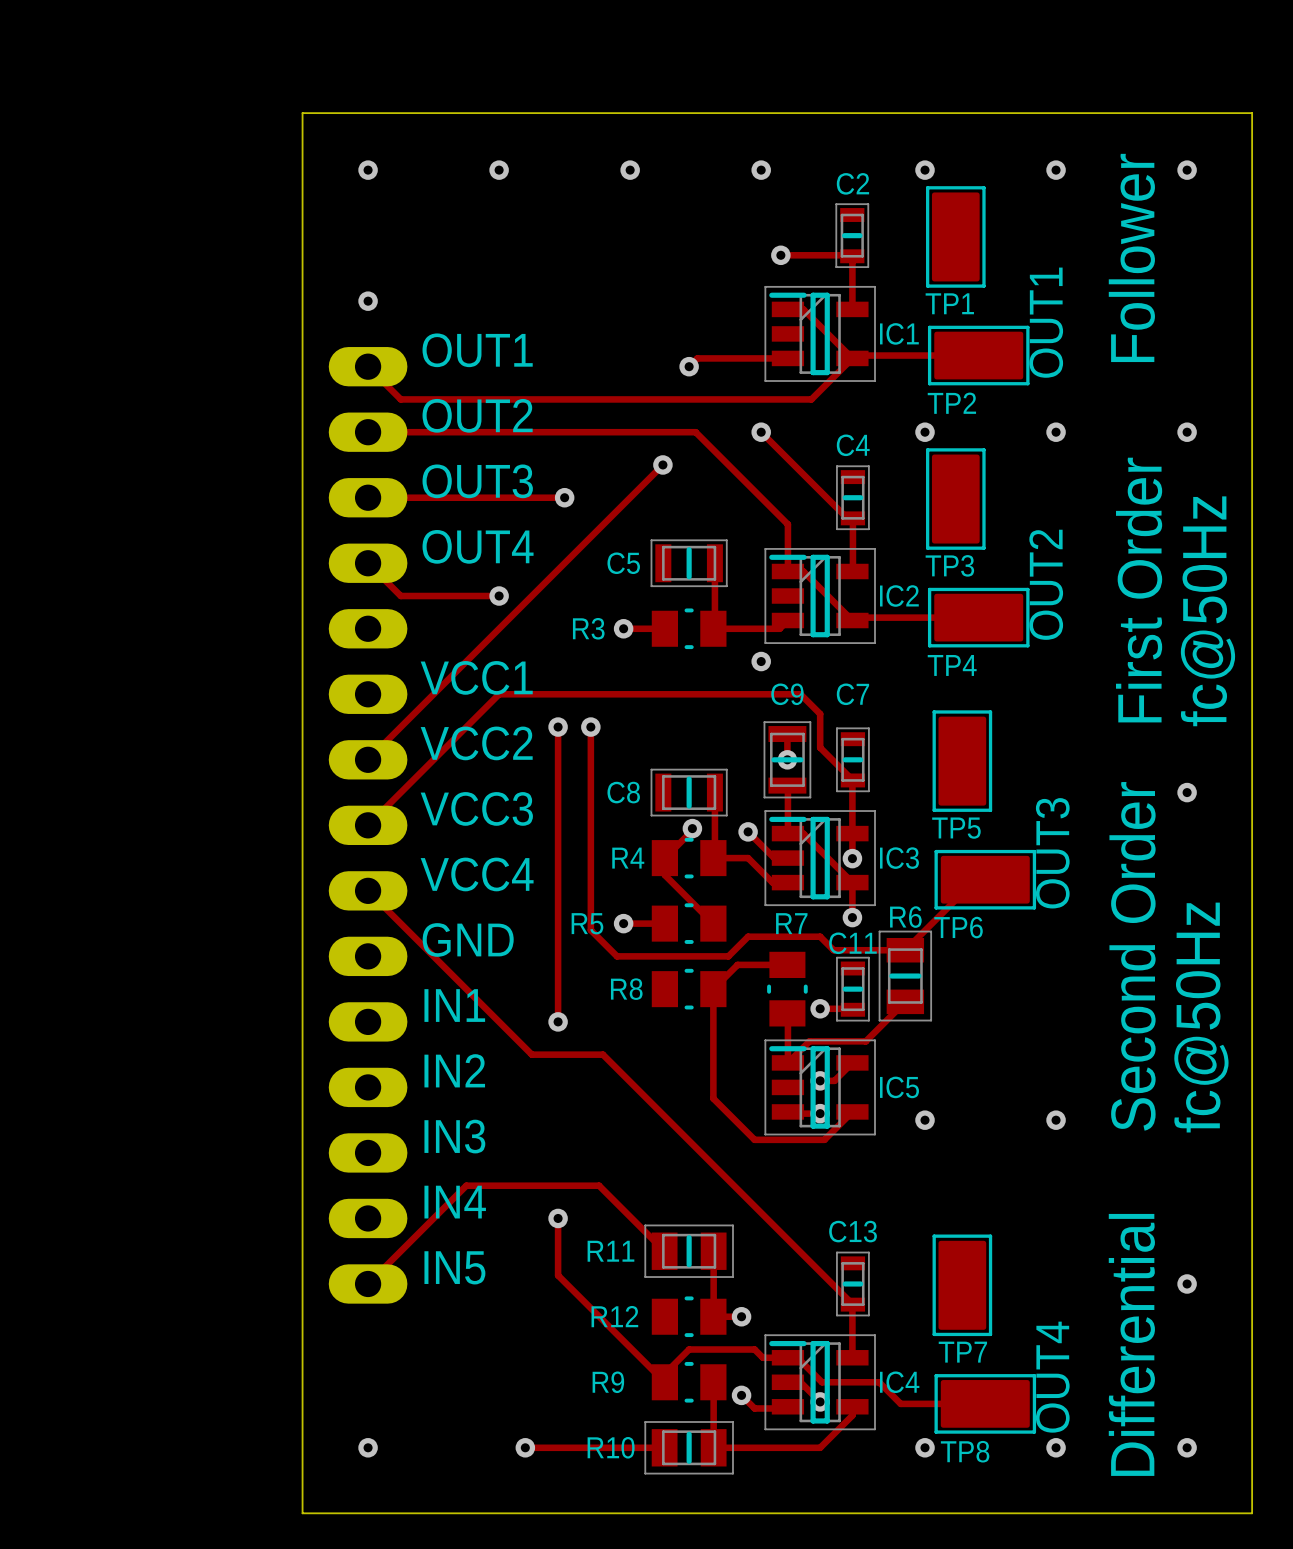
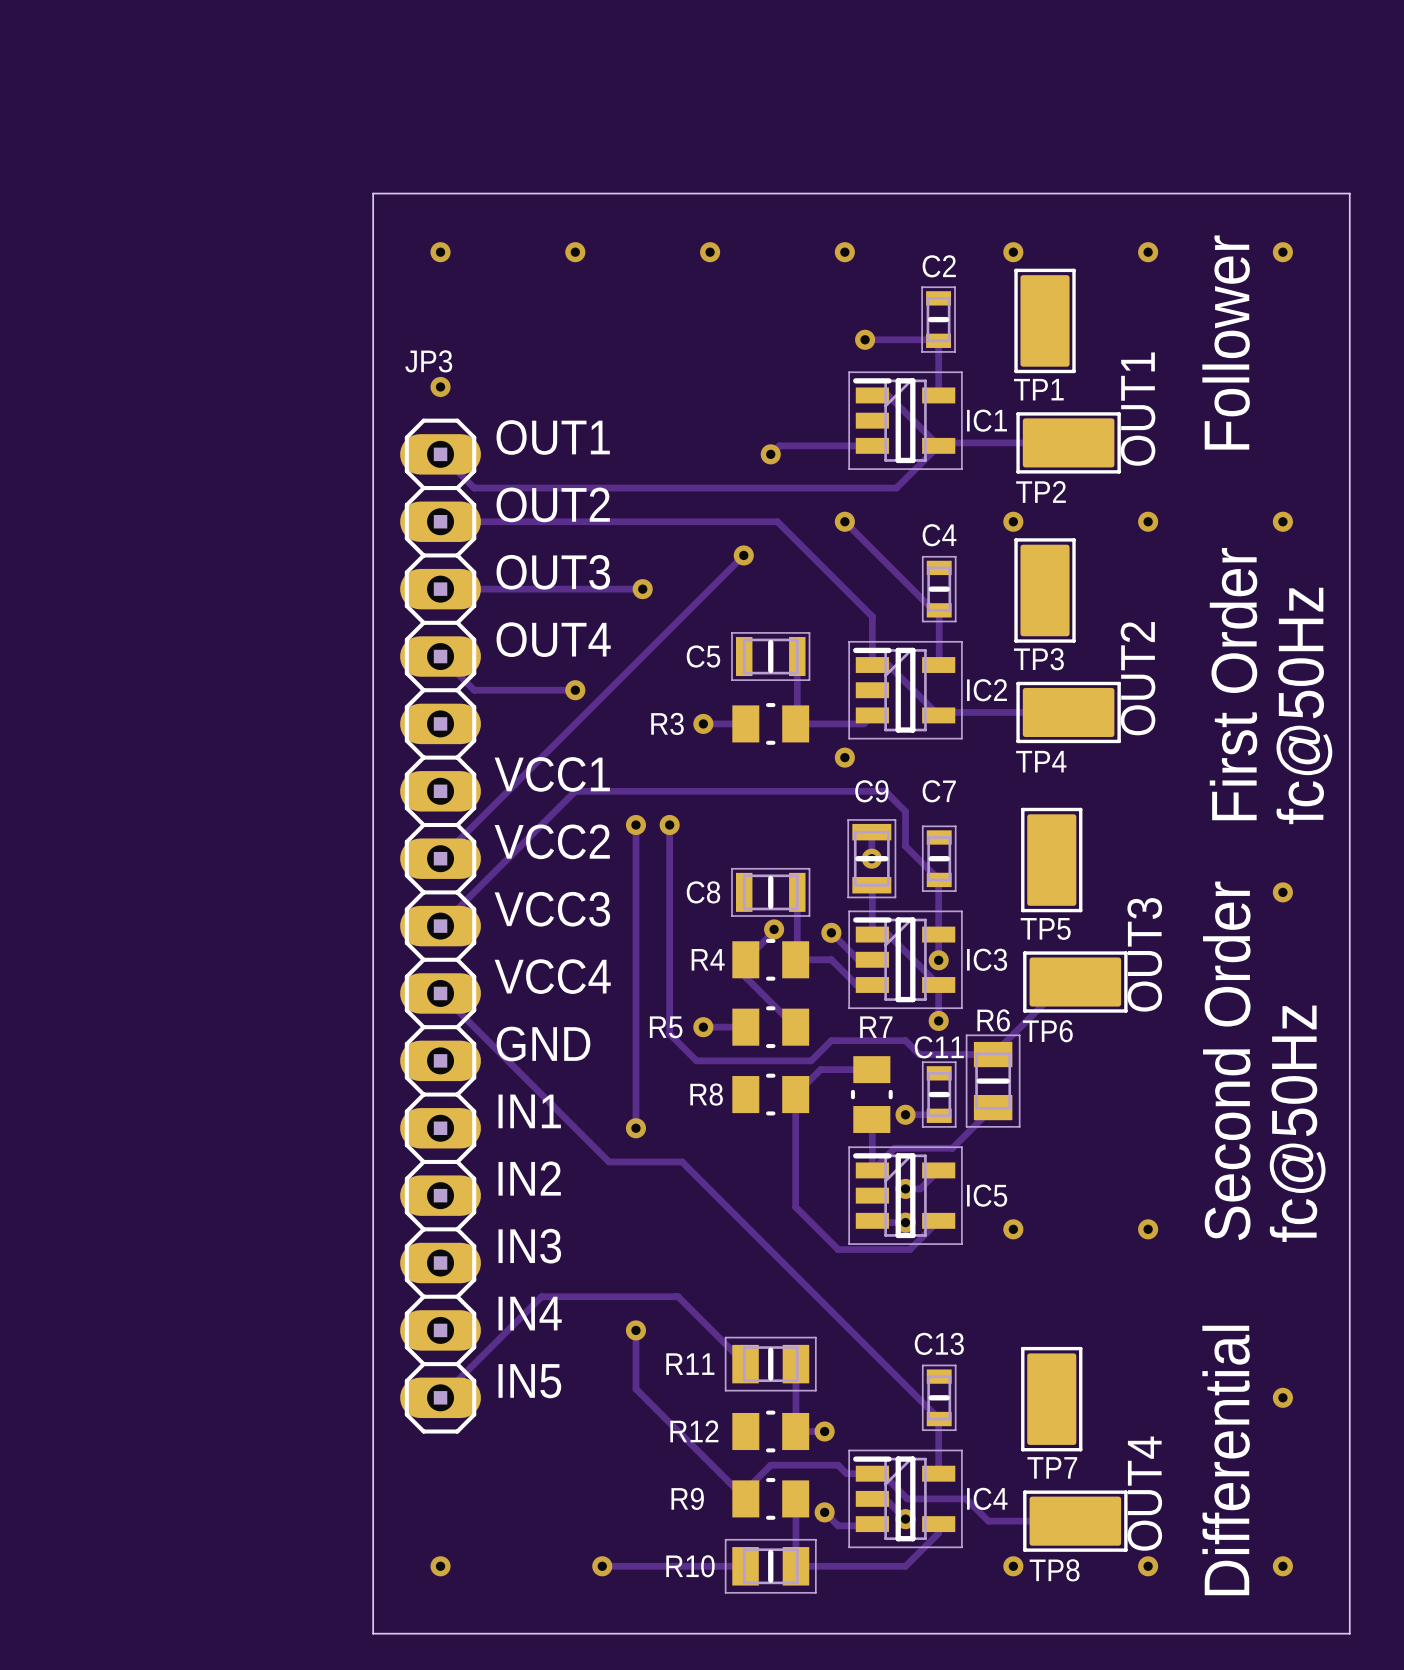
JP3 side: bottom (368, 825) -> top (440, 926)

